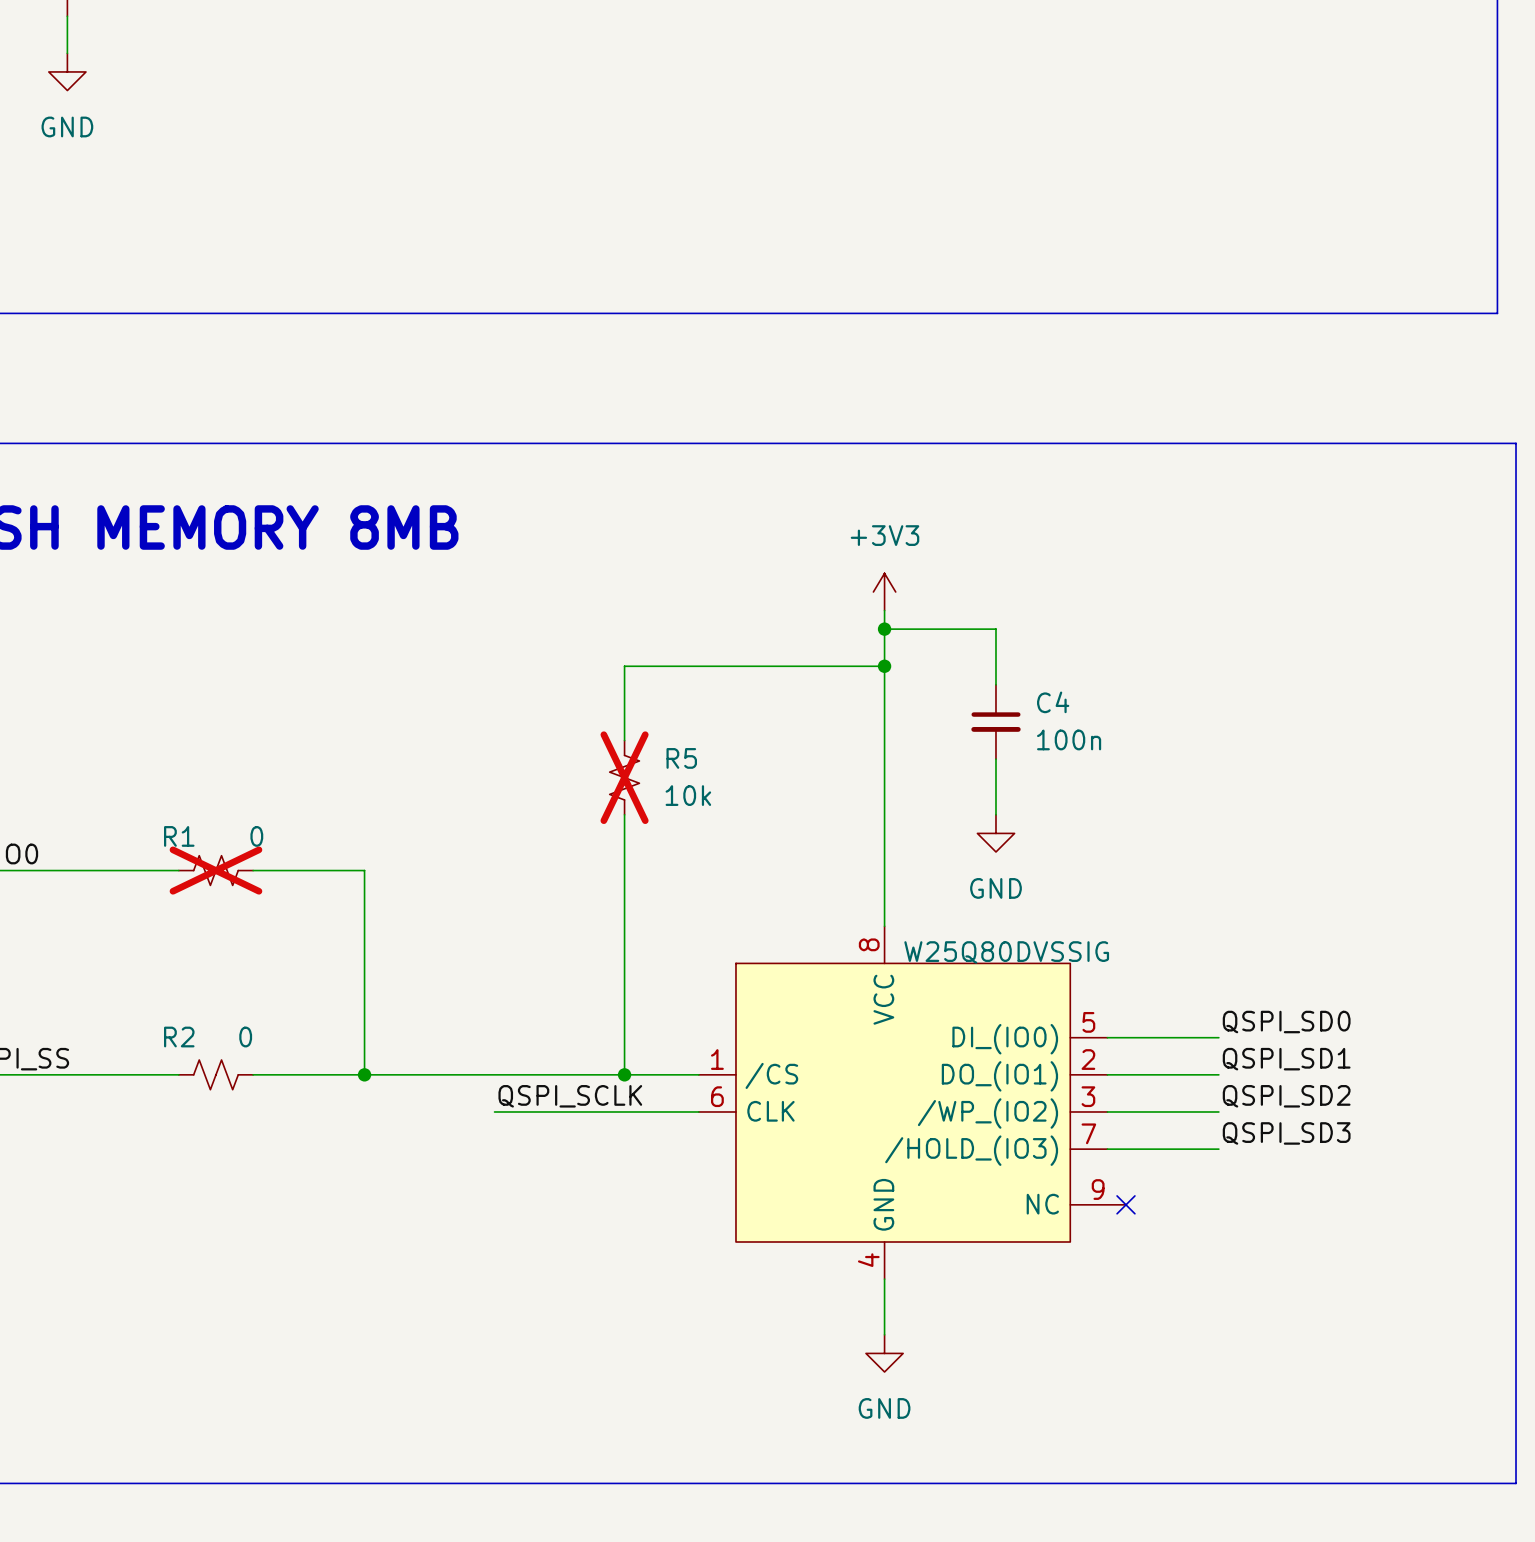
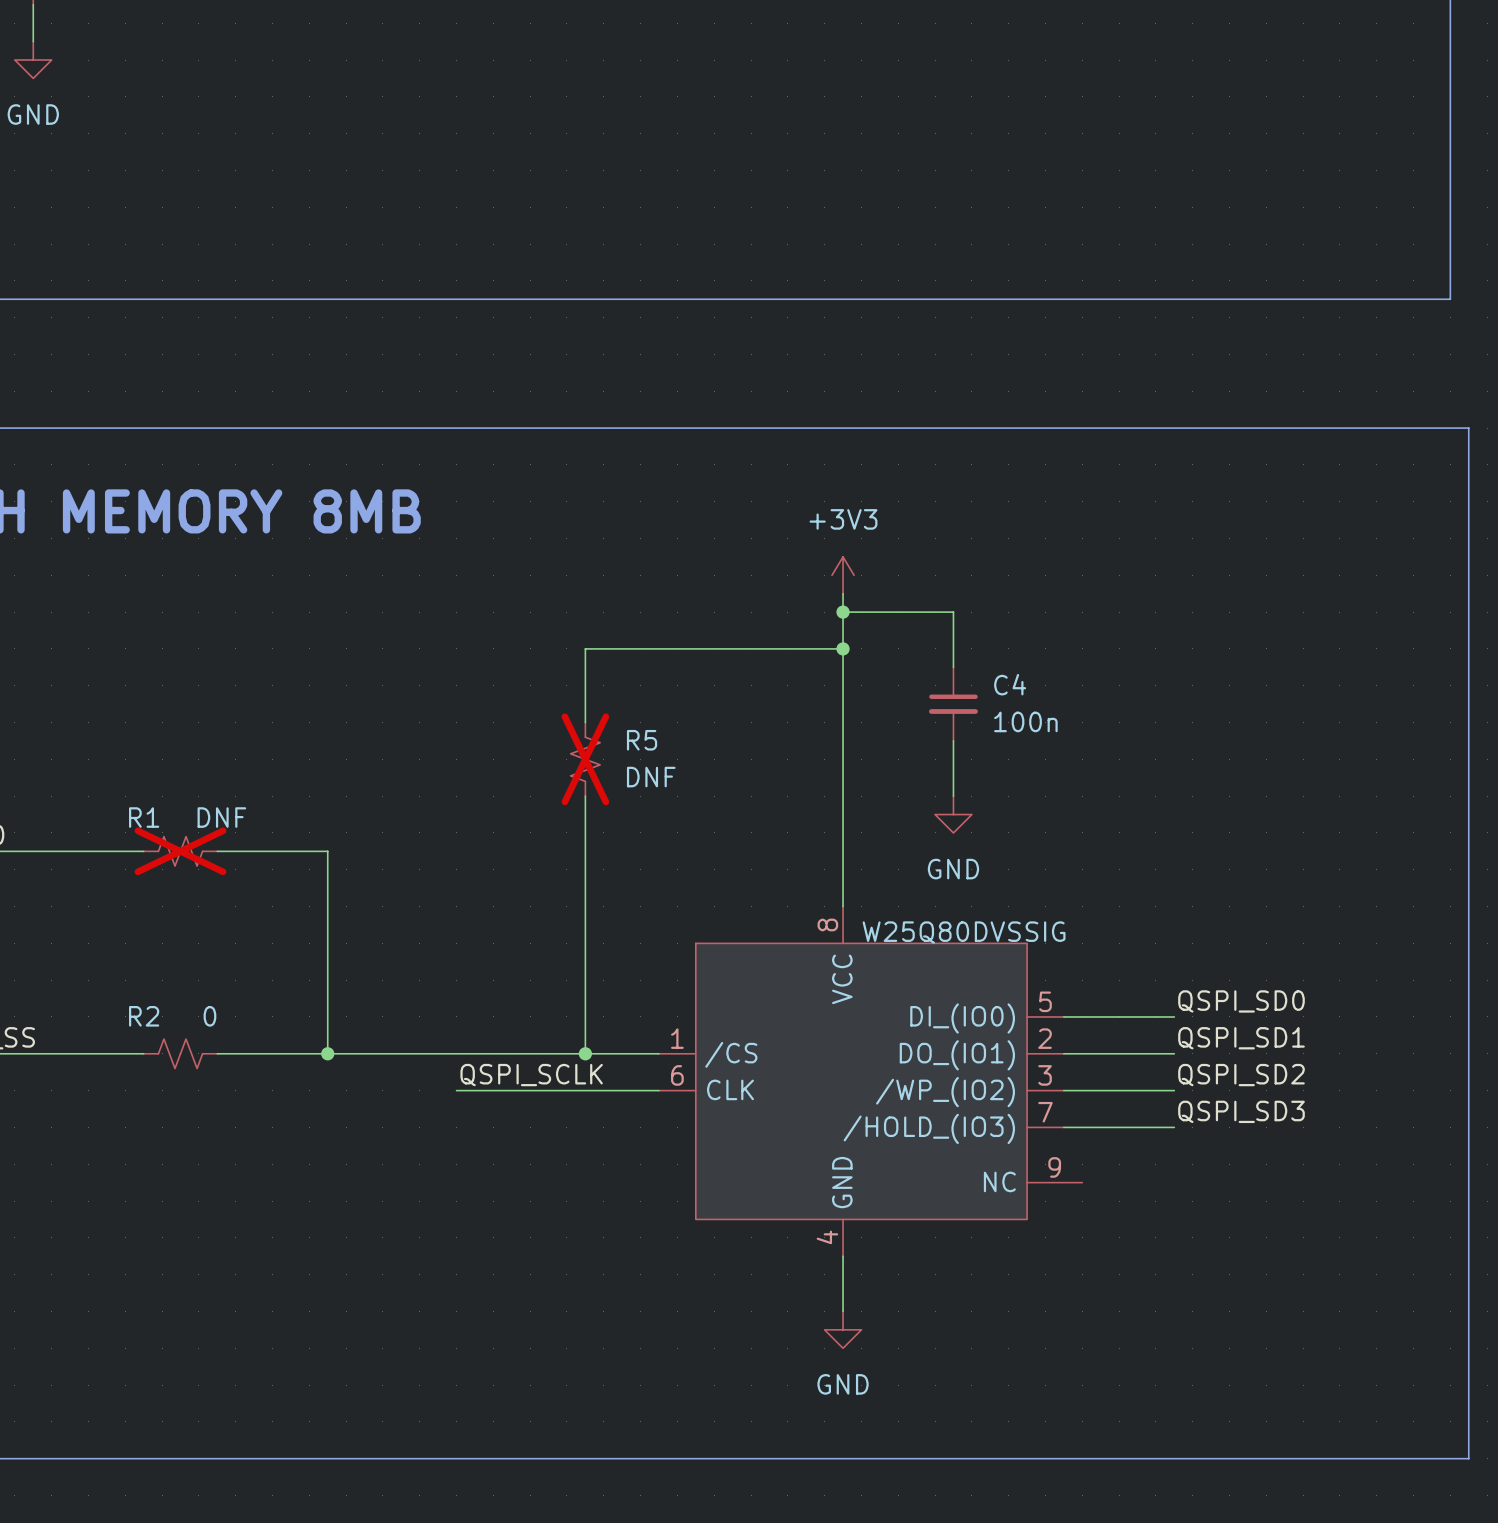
R5 value: 10k (688, 795) -> DNF (651, 777)
R1 value: 0 (256, 836) -> DNF (221, 817)
no-connect mark: (1125, 1204) -> none

